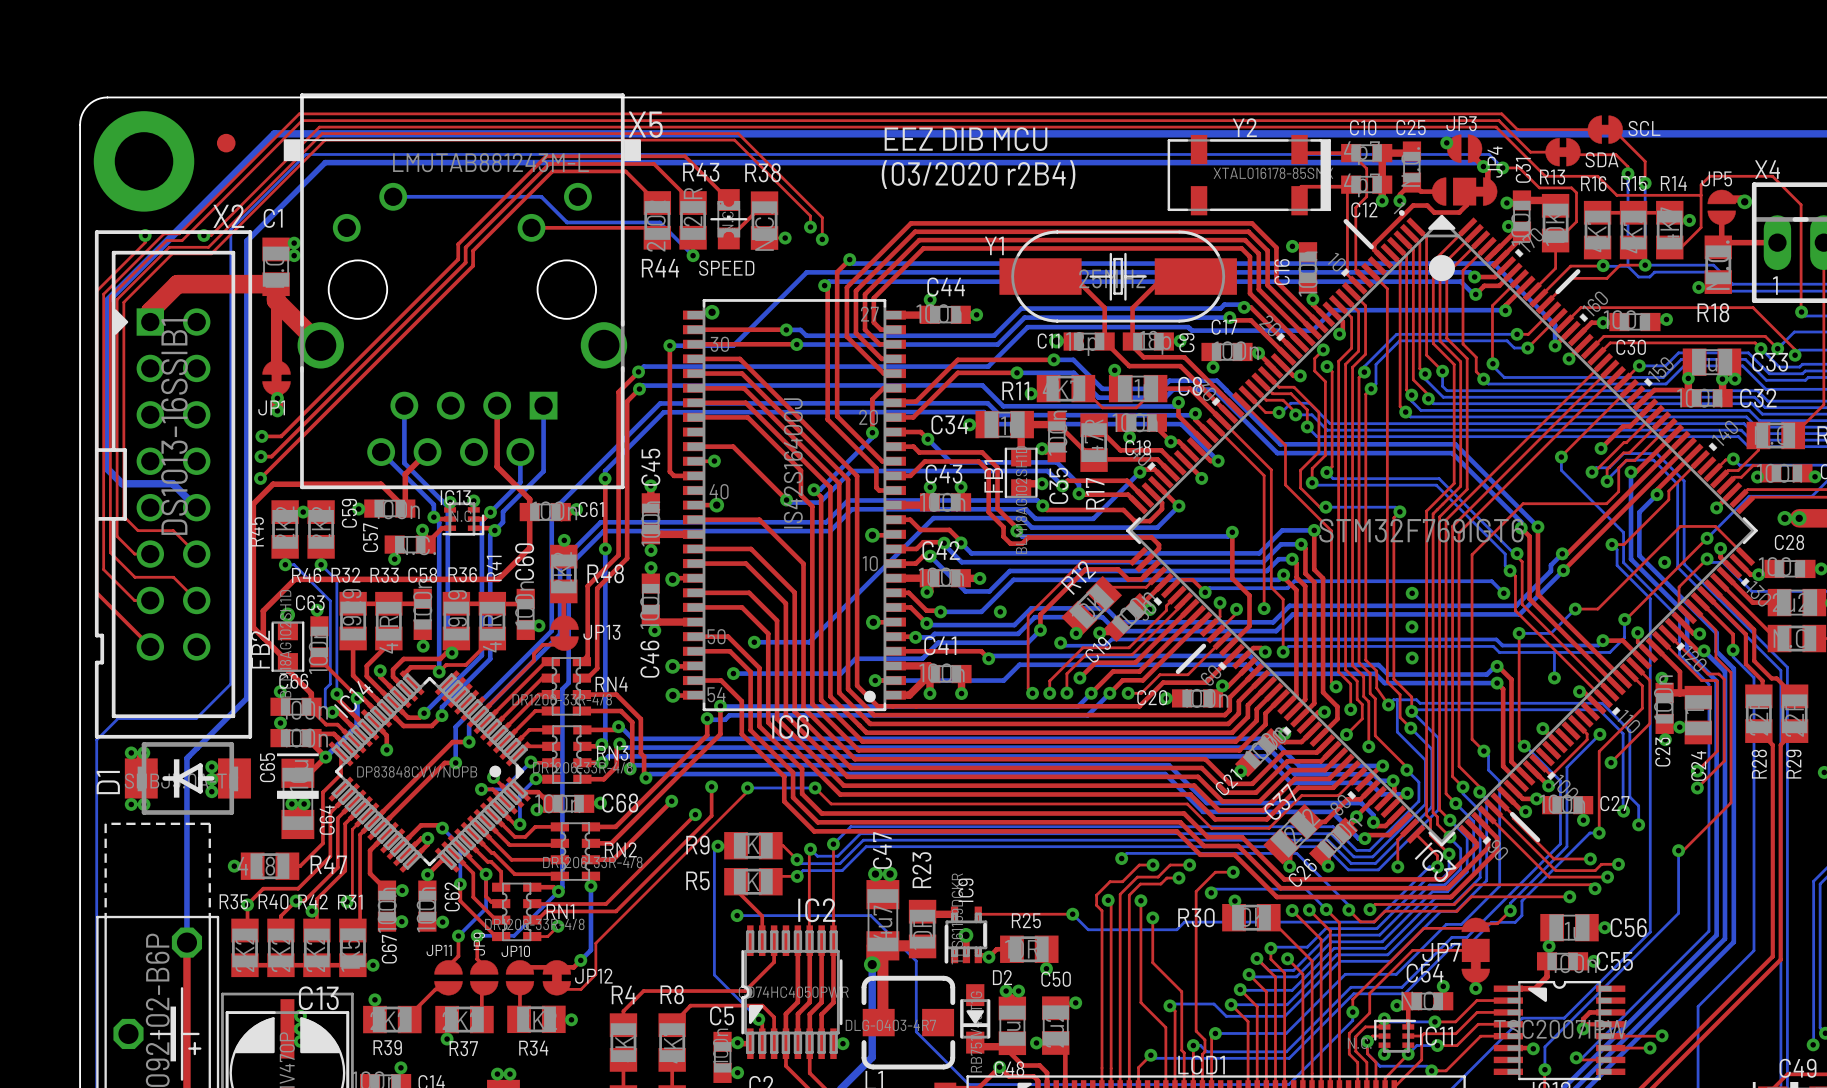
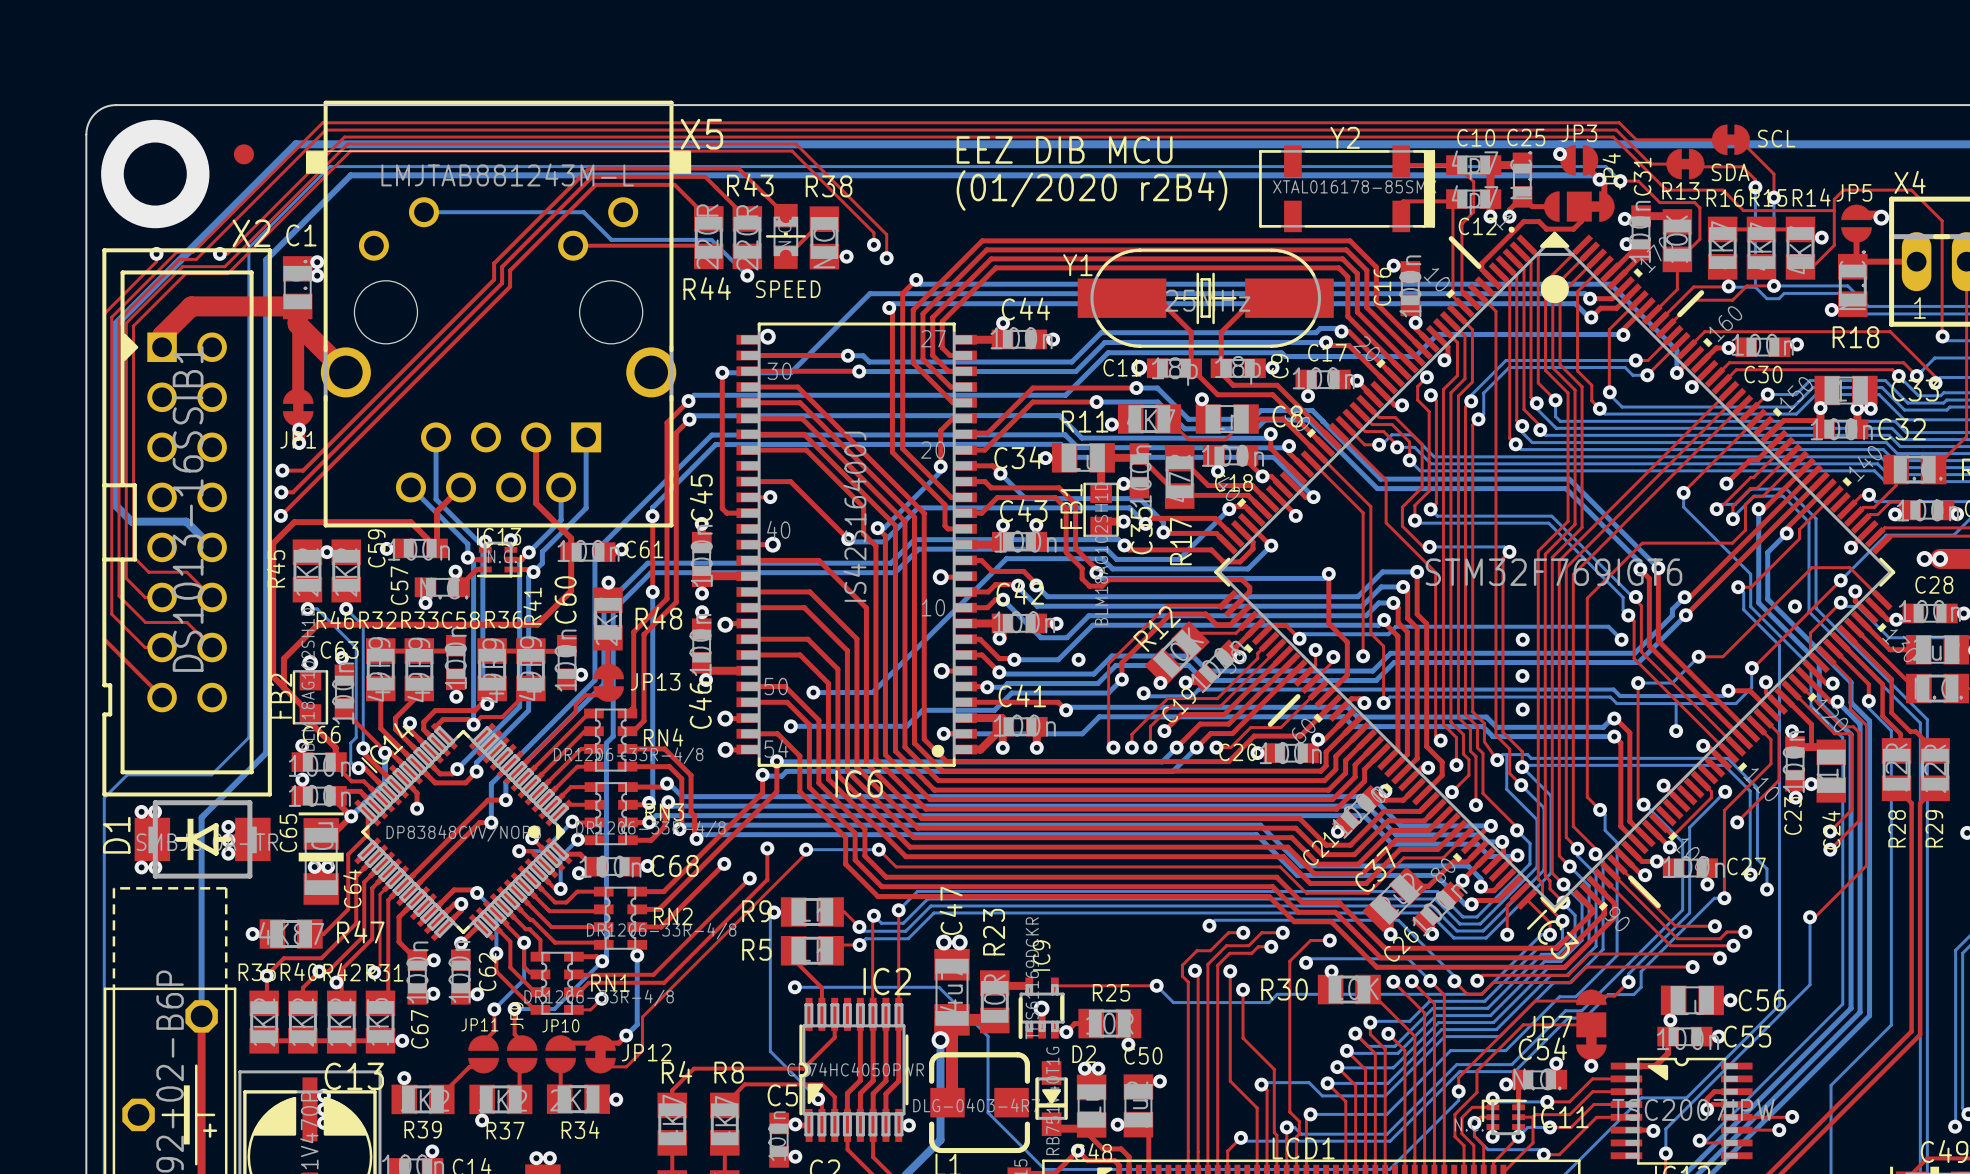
text: (03/2020 r2B4) (978, 174) -> (01/2020 r2B4) (1091, 190)

